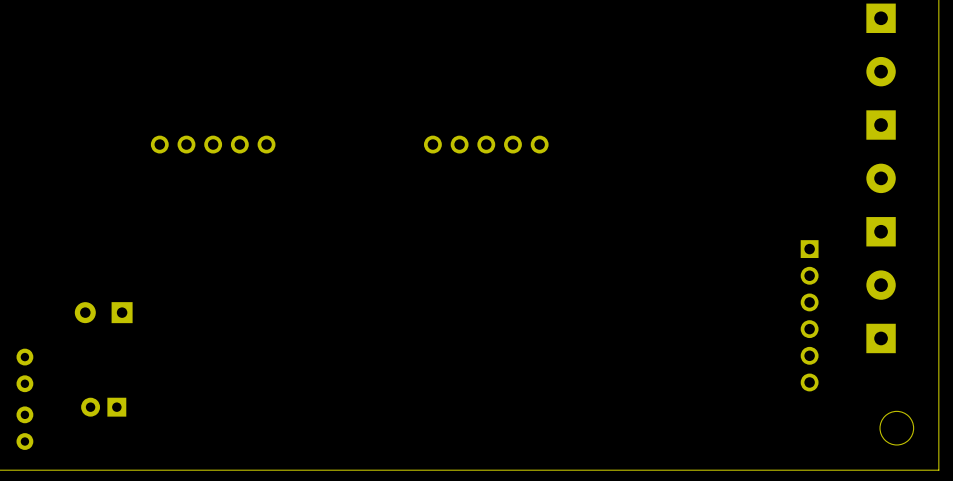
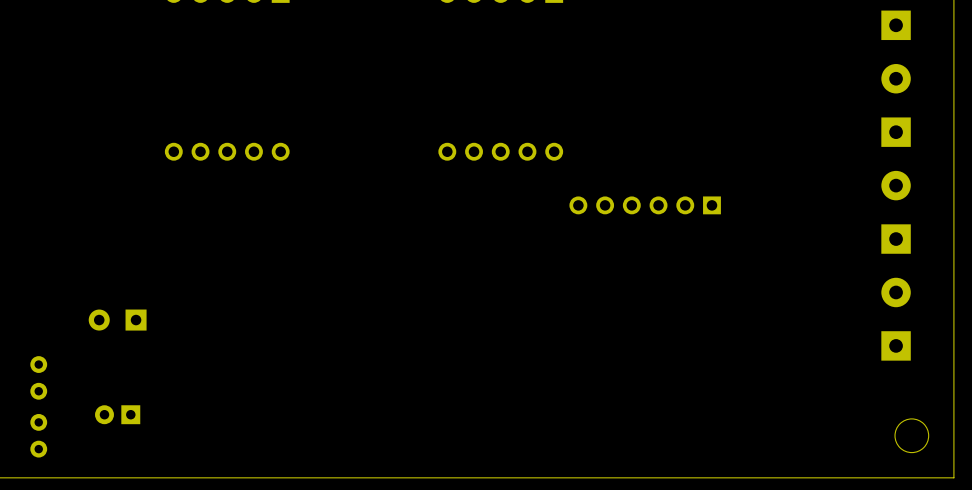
part rotation: 0° (809, 315) -> 90° clockwise (645, 205)
part position: (809, 315) -> (645, 205)

